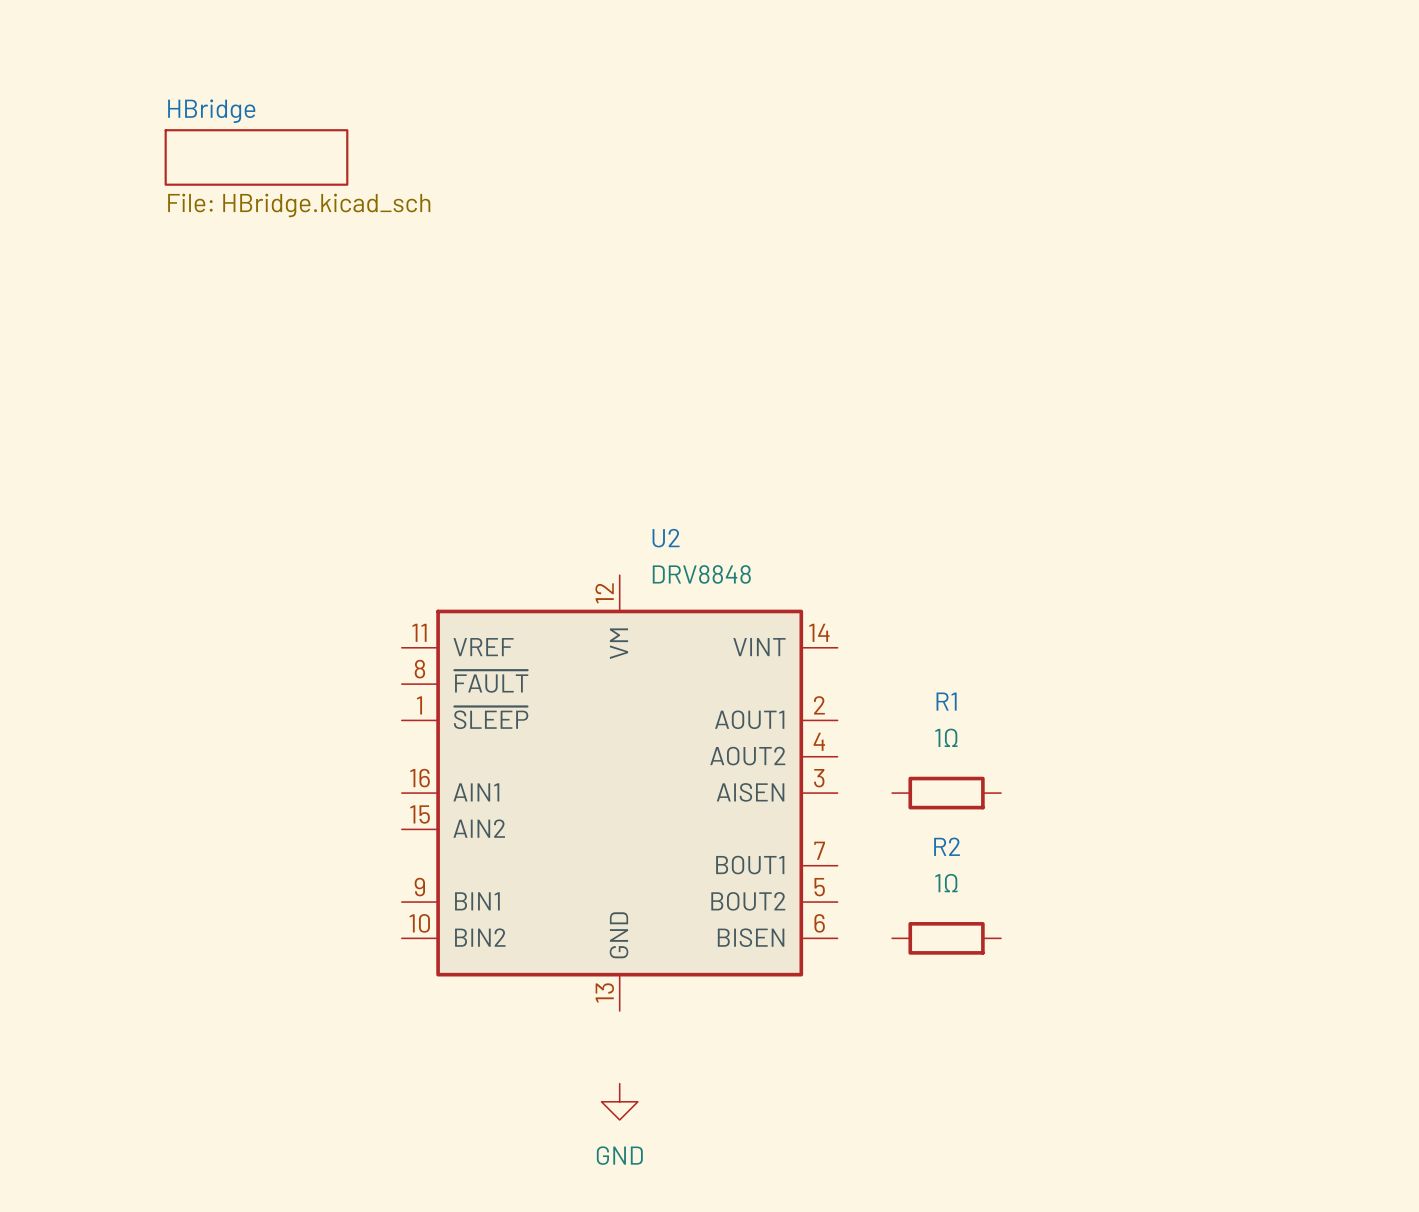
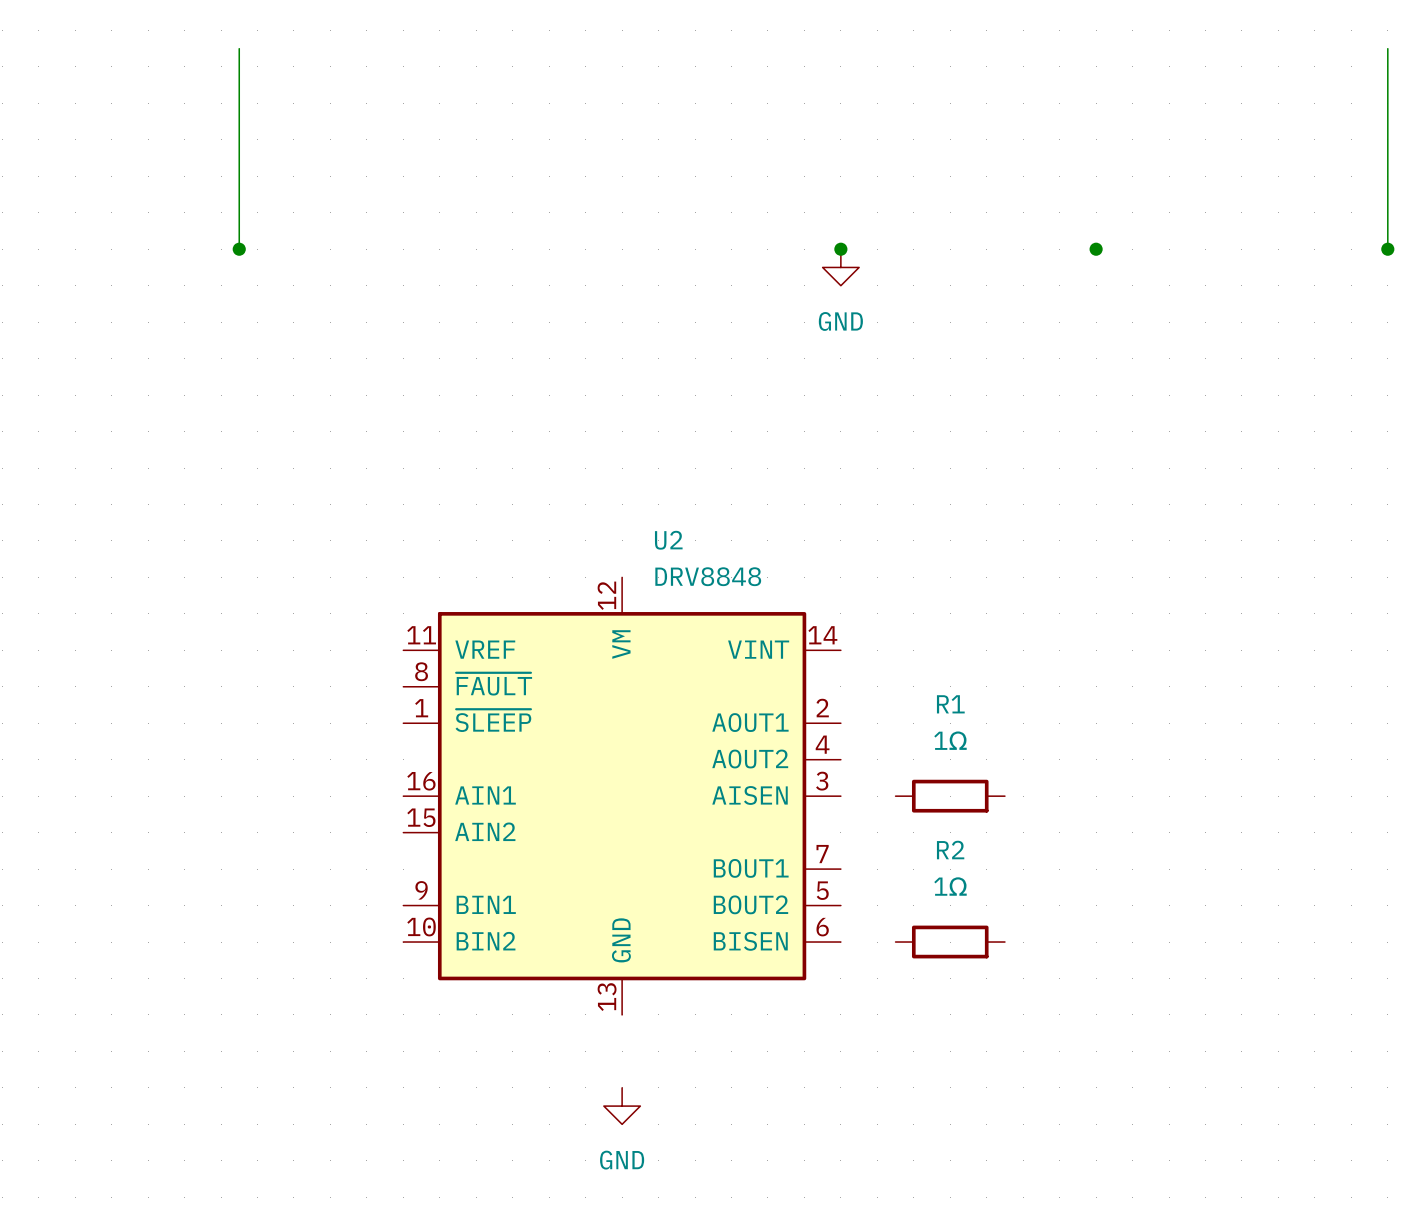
wire: none -> (239, 48) (239, 249)
wire: none -> (1387, 48) (1387, 249)
sheet HBridge: File: HBridge.kicad_sch (256, 157) -> none
junction: none -> (239, 249)
junction: none -> (840, 249)
junction: none -> (1096, 249)
junction: none -> (1387, 249)
power symbol: none -> GND (840, 267)

